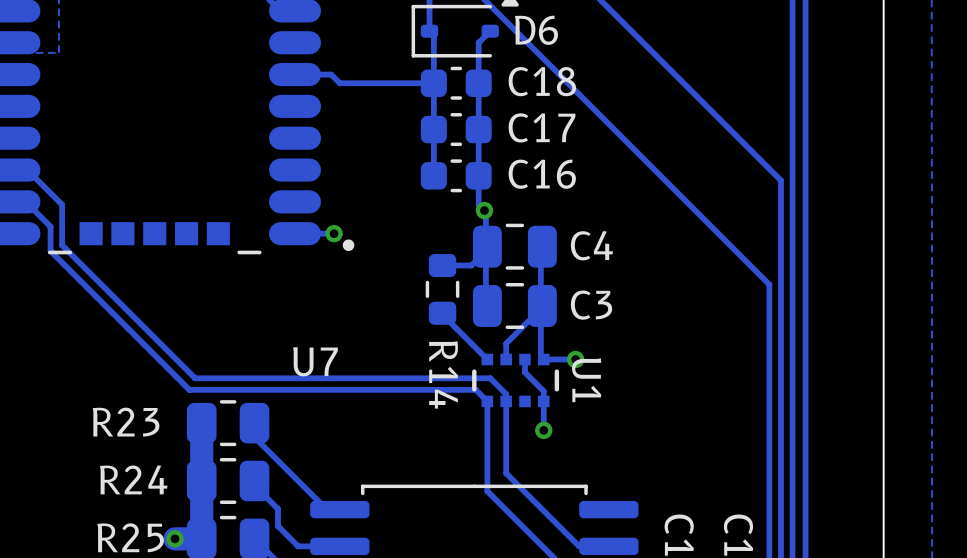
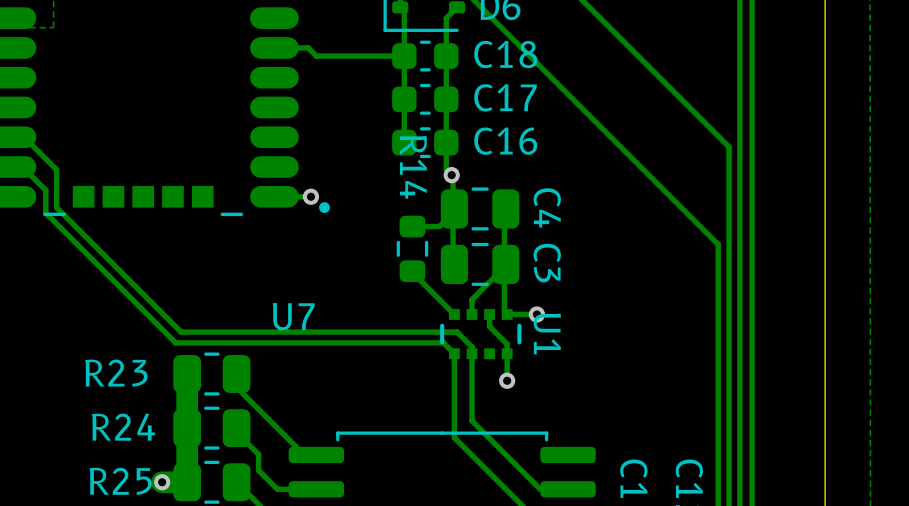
C4 name rotation: 0° (591, 245) -> 90° clockwise (547, 207)
C3 name rotation: 0° (591, 305) -> 90° clockwise (547, 263)
R14 name position: R14 (443, 374) -> R14 (413, 167)

